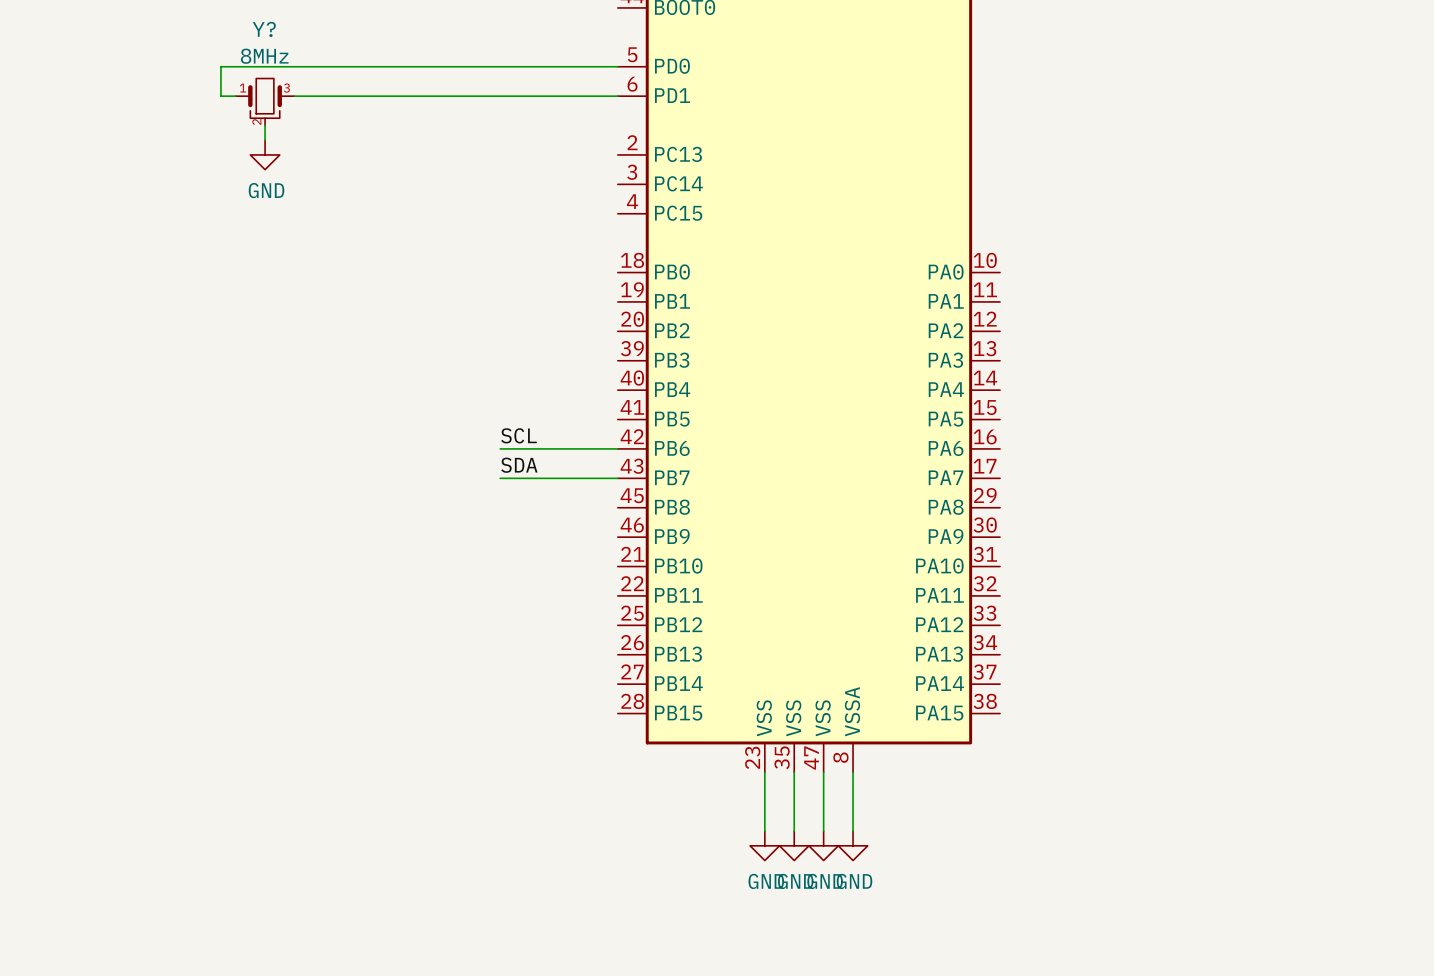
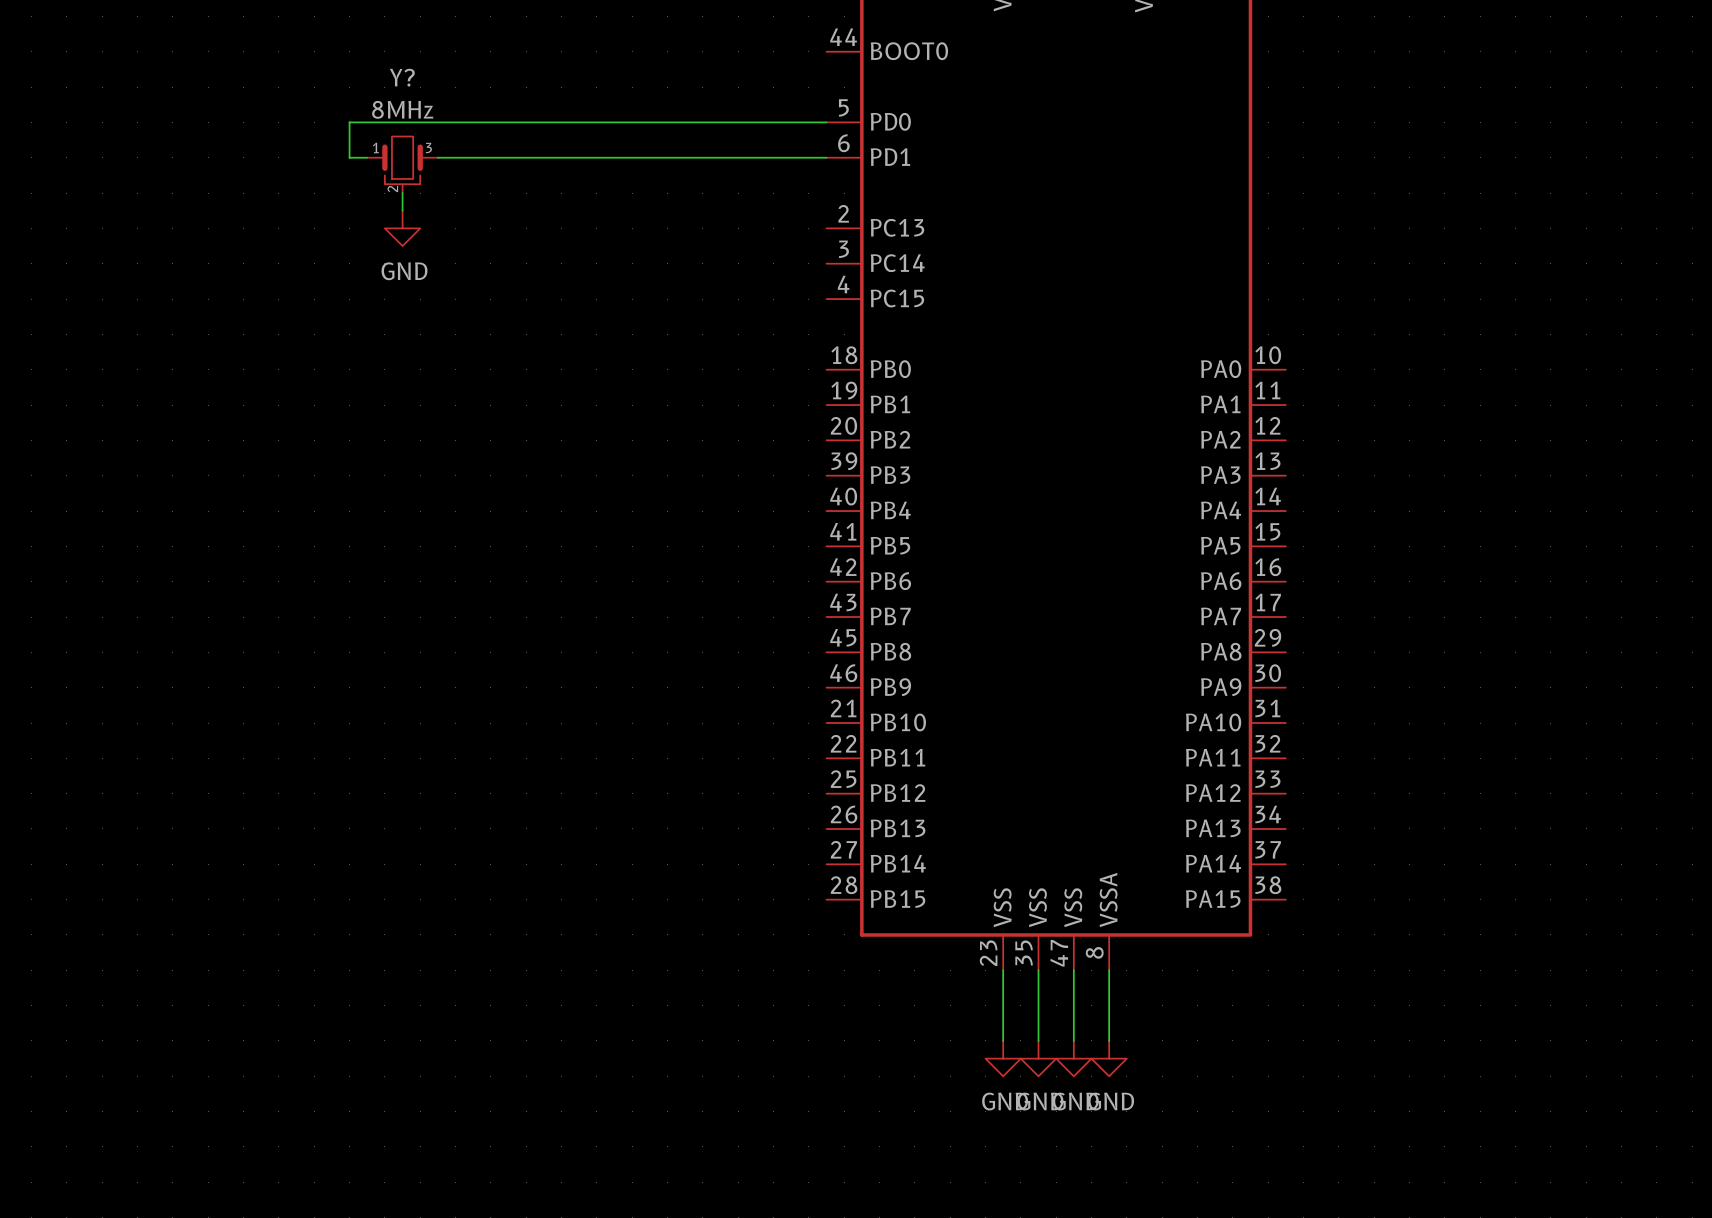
label: SCL (518, 435) -> none
wire: (500, 448) (617, 448) -> none
label: SDA (519, 465) -> none
wire: (500, 478) (617, 478) -> none

